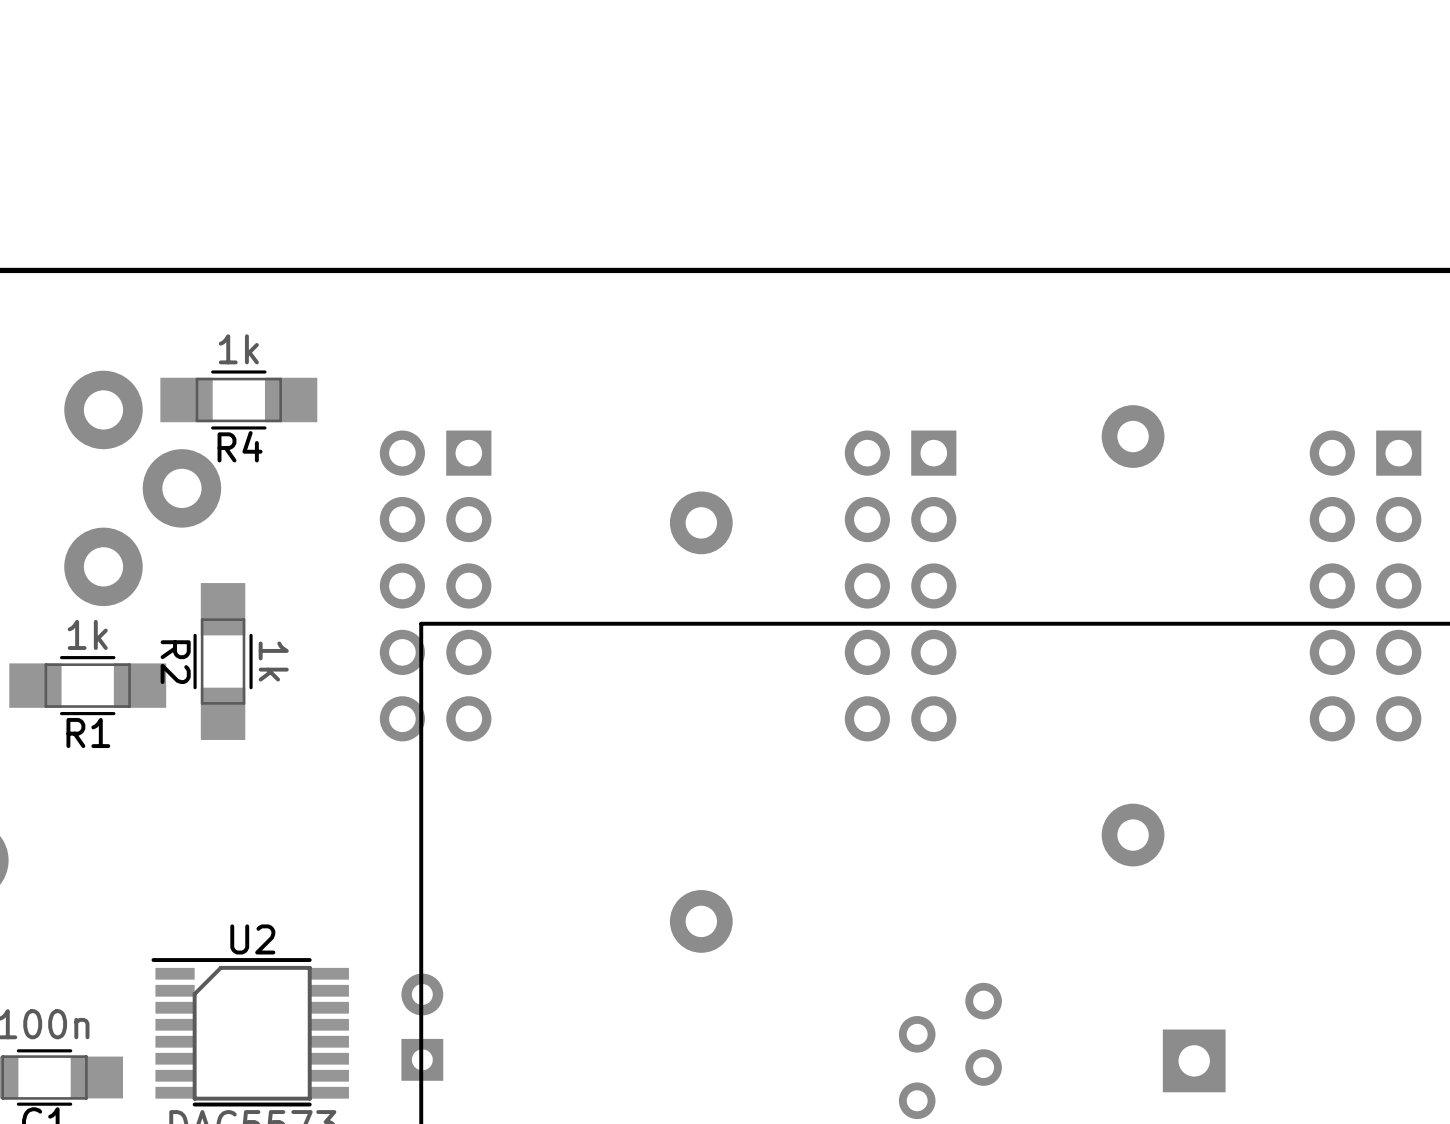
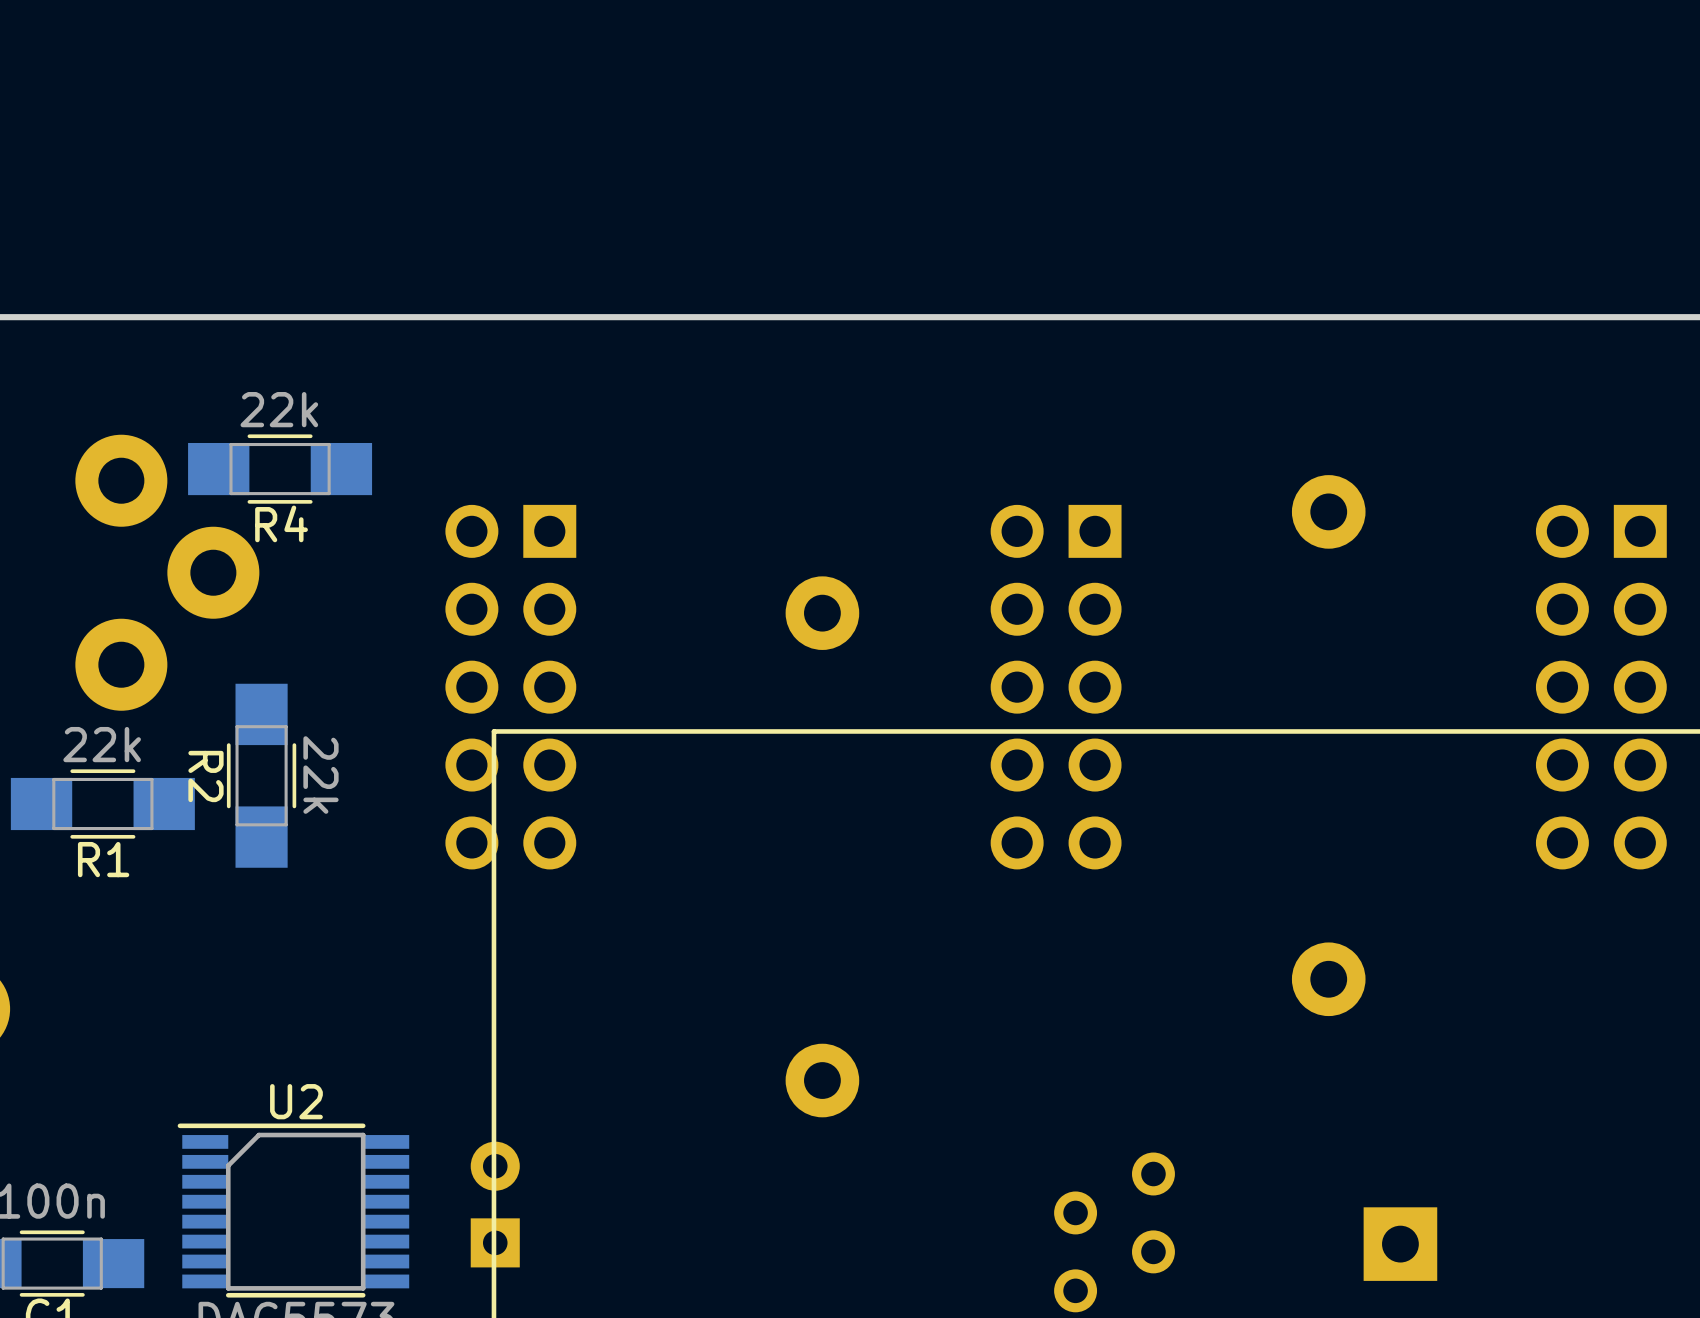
R4 value: 1k (238, 349) -> 22k (279, 409)
R1 value: 1k (87, 634) -> 22k (102, 744)
R2 value: 1k (273, 661) -> 22k (320, 775)

